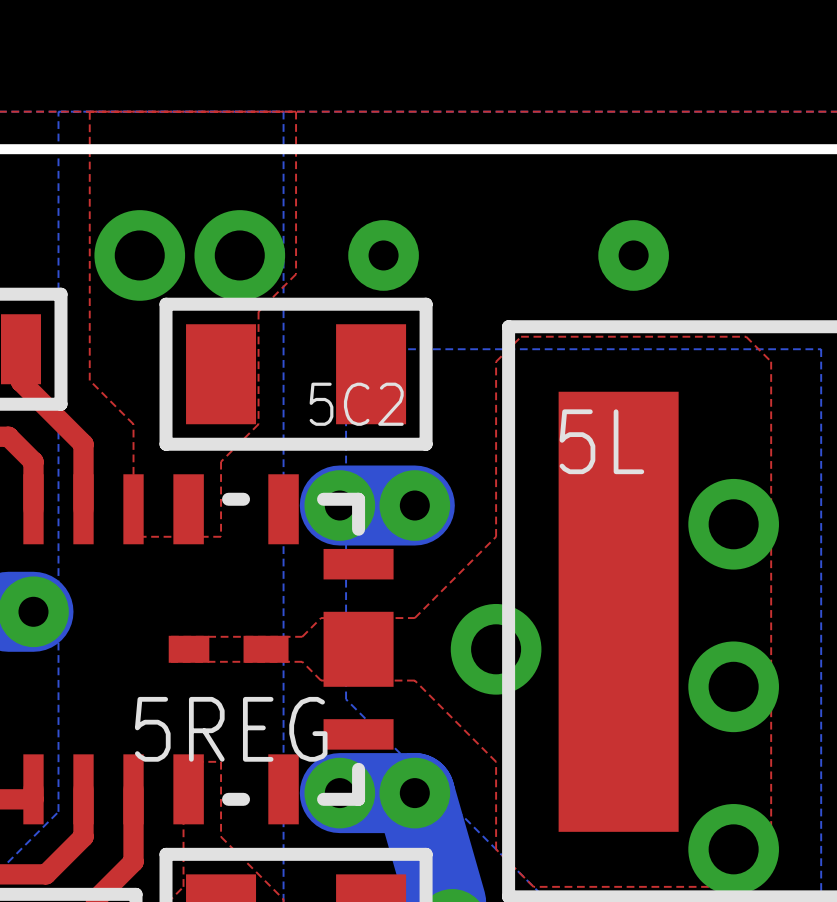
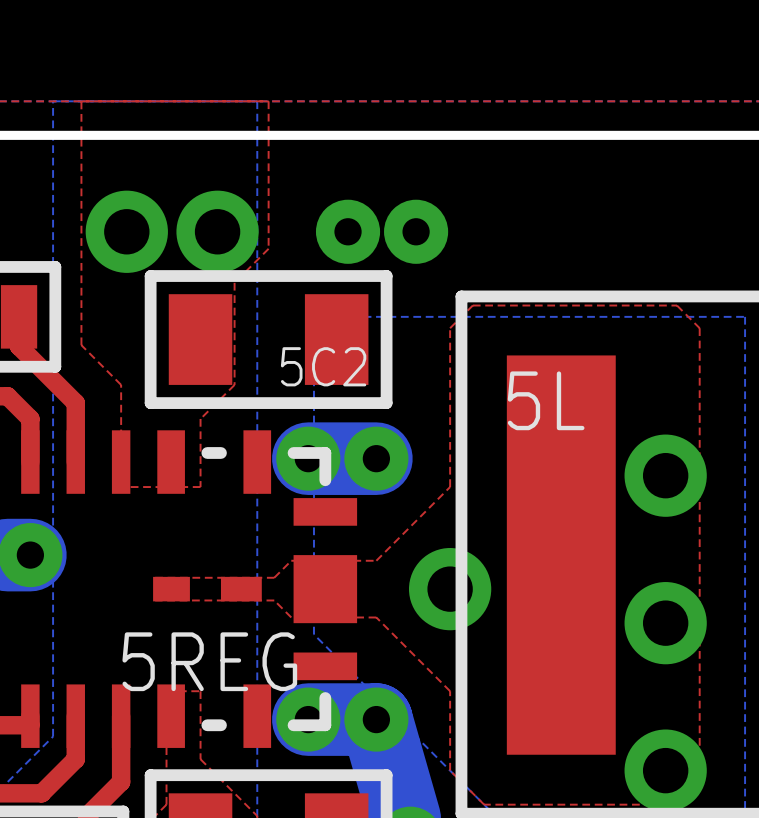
via position: (633, 255) -> (416, 231)

